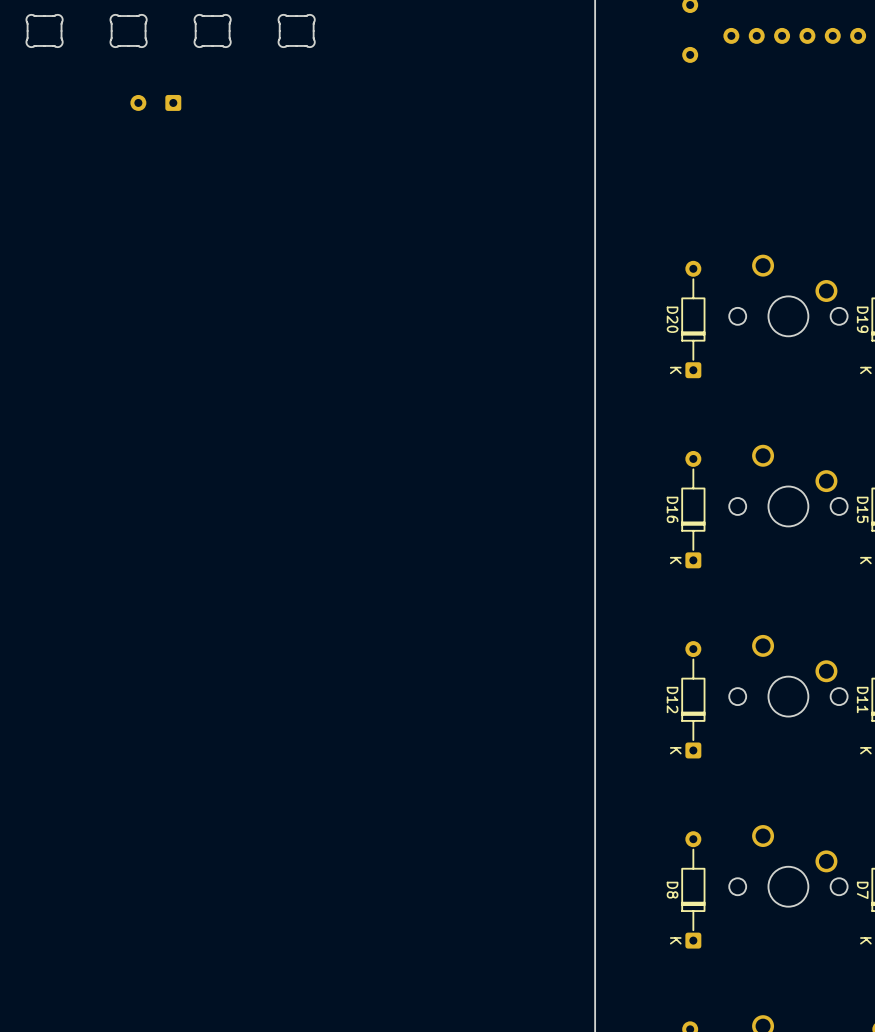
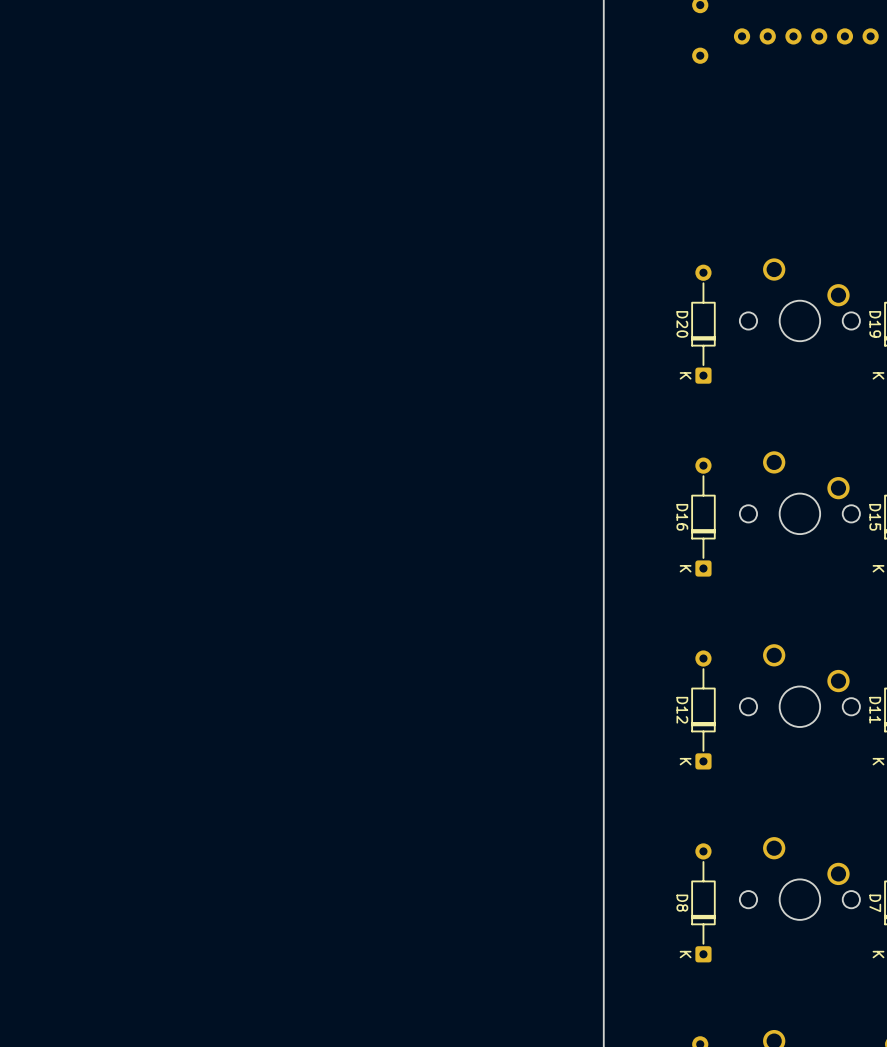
part: (44, 30) -> none
part: (128, 30) -> none
part: (212, 30) -> none
part: (296, 30) -> none
part: (155, 102) -> none

